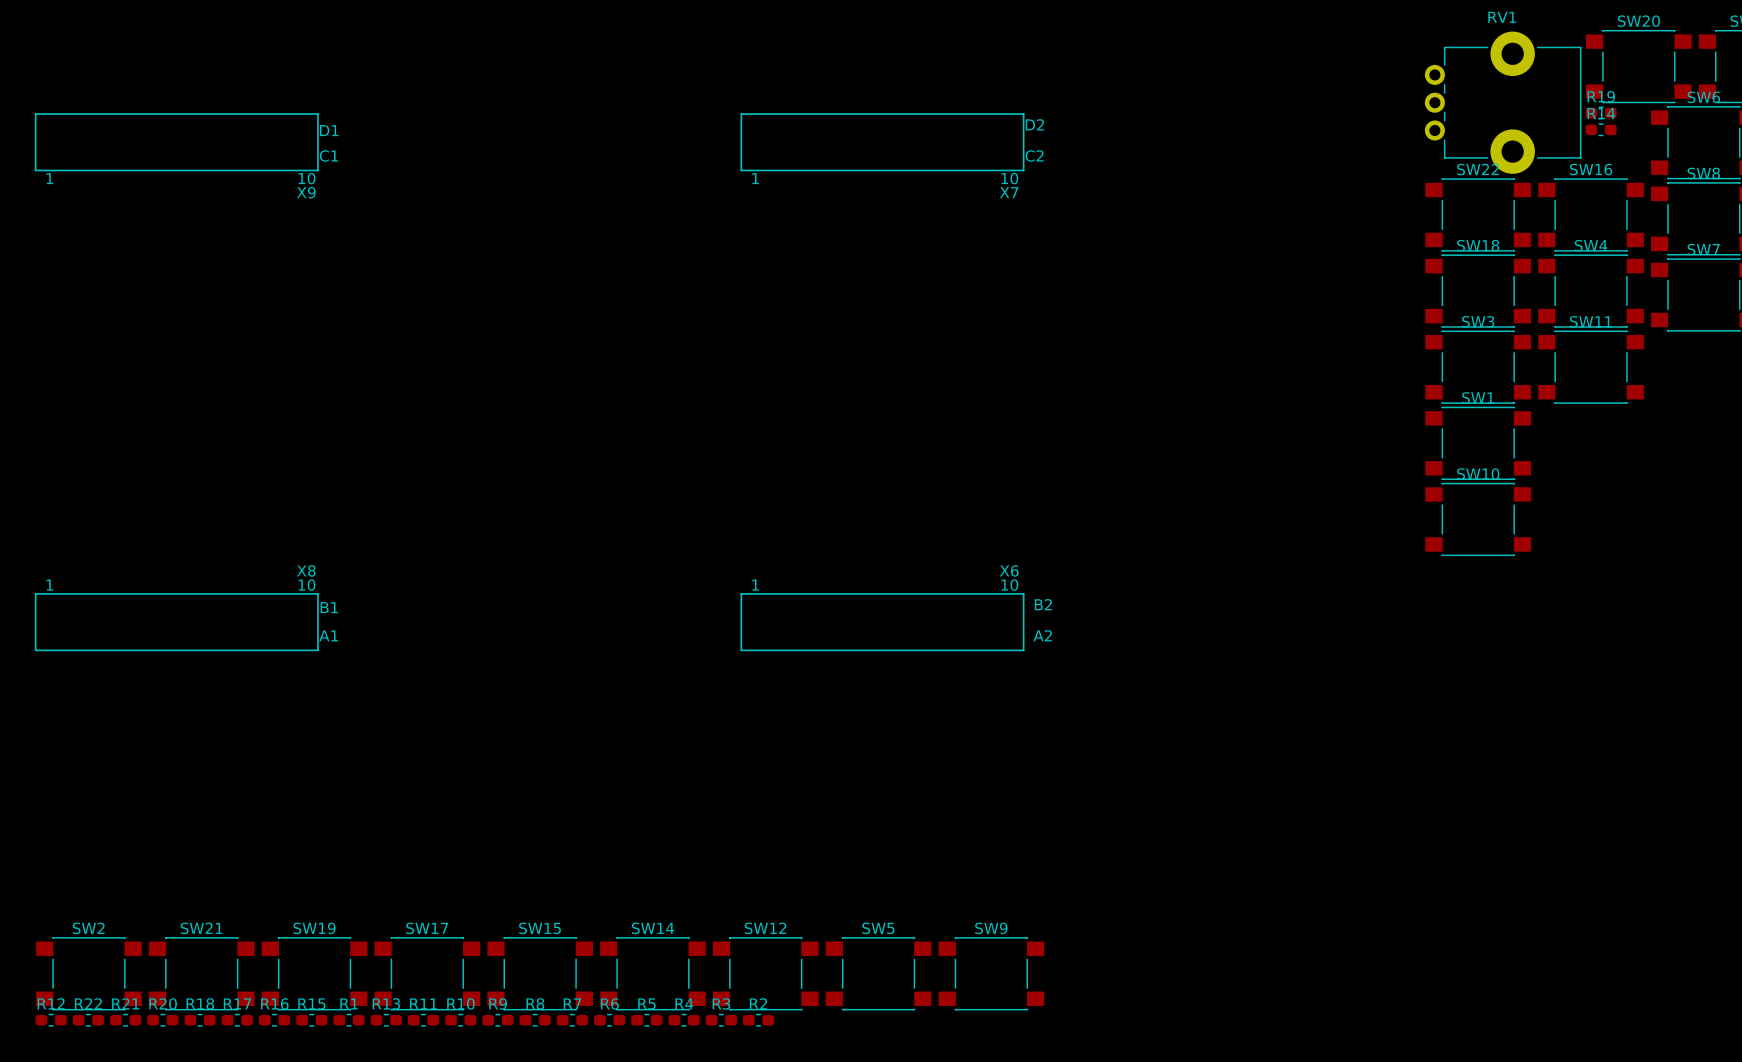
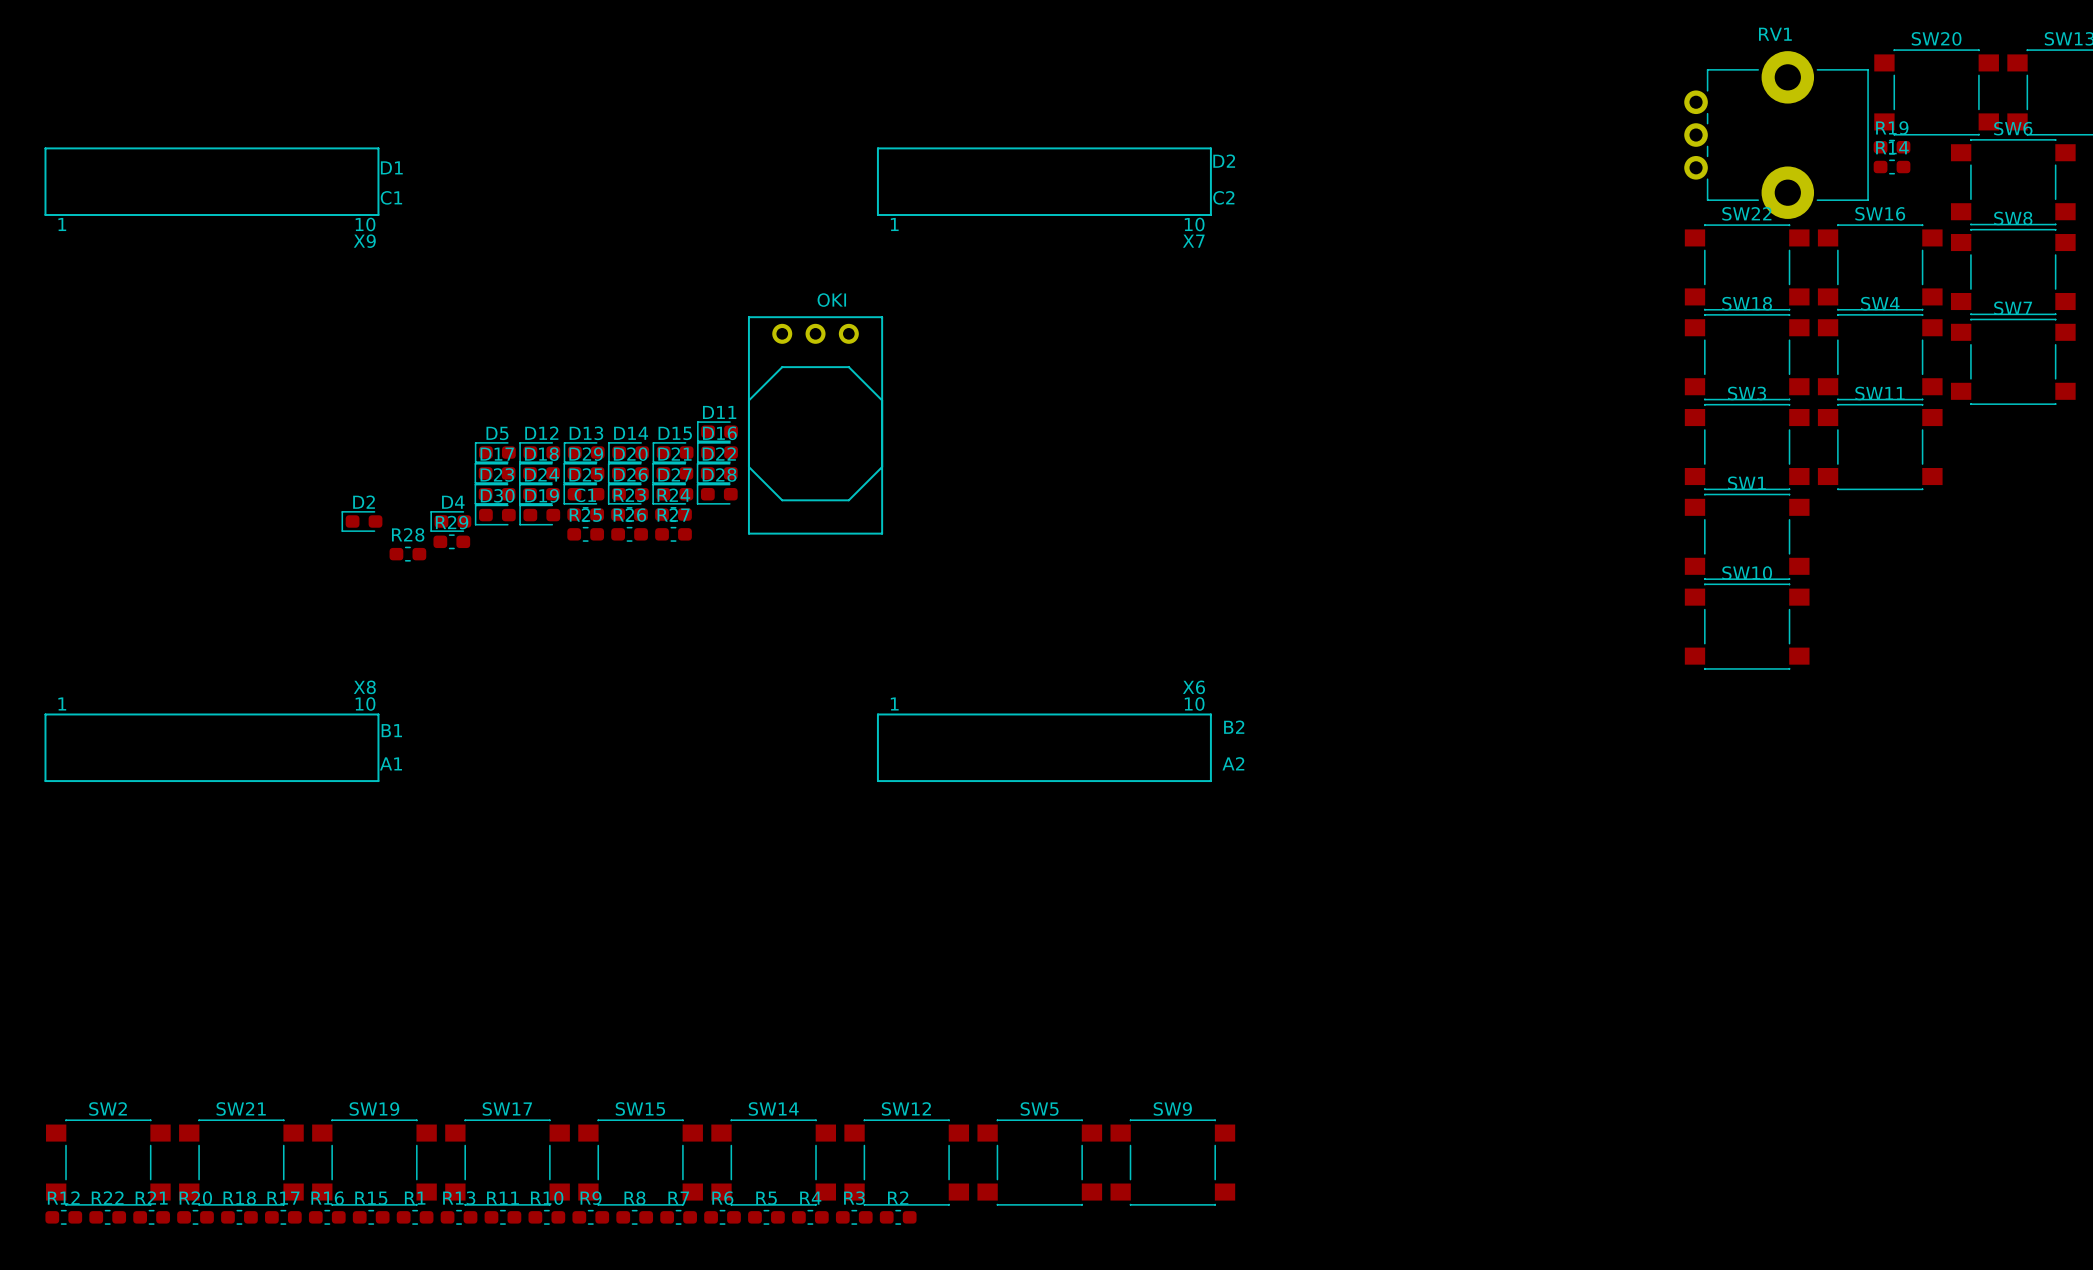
part: none -> OKI (815, 425)
D11: none -> (717, 431)
D5: none -> (495, 452)
D12: none -> (539, 452)
D13: none -> (584, 452)
D14: none -> (628, 452)
D15: none -> (673, 452)
D16: none -> (717, 452)
D17: none -> (495, 473)
D18: none -> (539, 473)
D29: none -> (583, 473)
D20: none -> (628, 473)
D21: none -> (672, 473)
D22: none -> (717, 473)
D23: none -> (495, 494)
D24: none -> (539, 494)
D25: none -> (583, 494)
D26: none -> (628, 494)
D27: none -> (672, 494)
D28: none -> (717, 494)
D30: none -> (495, 515)
D19: none -> (539, 515)
C1: none -> (585, 514)
R23: none -> (629, 514)
R24: none -> (673, 514)
D2: none -> (361, 521)
D4: none -> (450, 521)
R25: none -> (585, 534)
R26: none -> (629, 534)
R27: none -> (673, 534)
R29: none -> (451, 541)
R28: none -> (407, 554)

